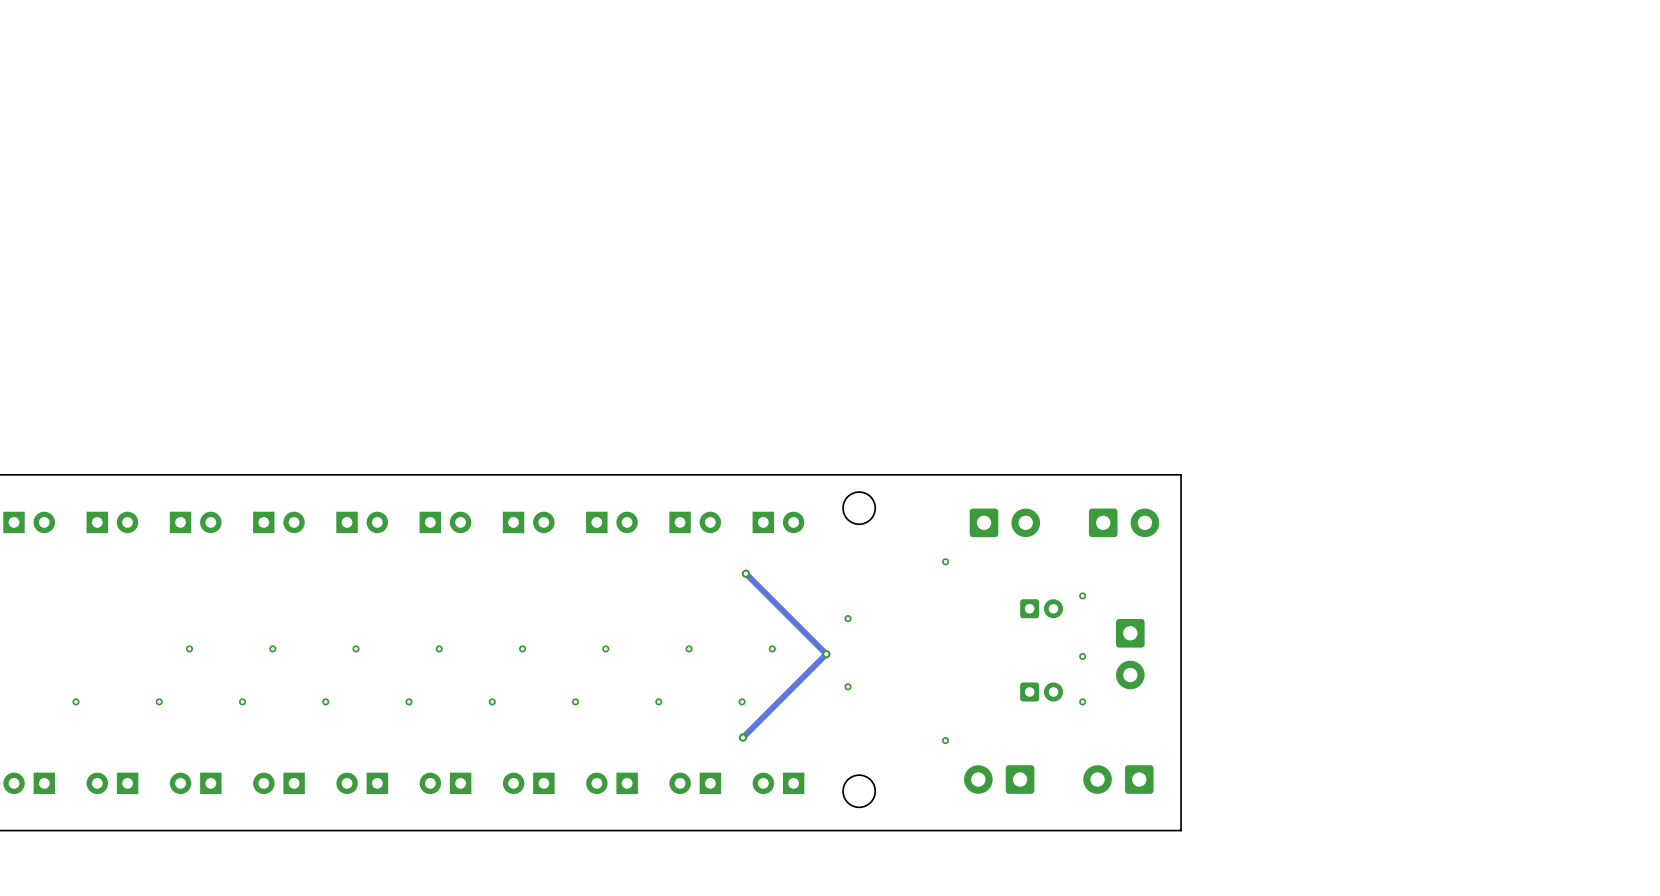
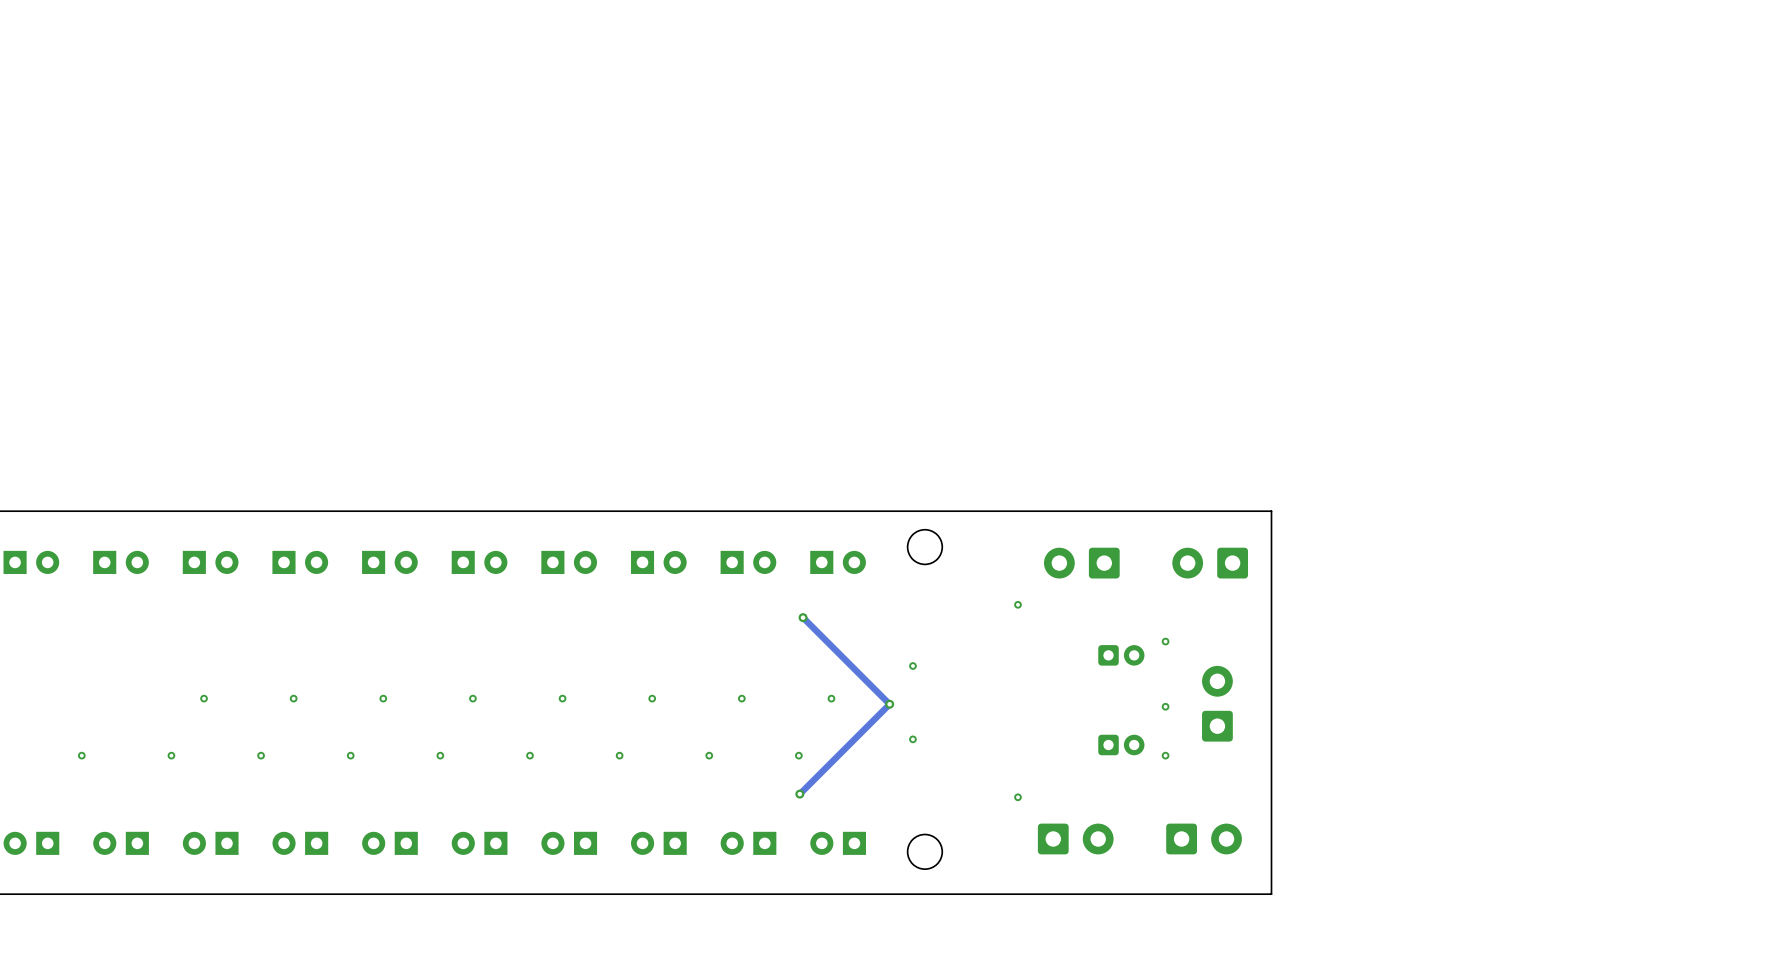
part rotation: 0° (1004, 522) -> 180° (1081, 563)
part rotation: 0° (1124, 522) -> 180° (1210, 563)
part rotation: 0° (1130, 654) -> 180° (1217, 703)
part rotation: 0° (999, 779) -> 180° (1075, 838)
part rotation: 0° (1118, 779) -> 180° (1204, 838)

